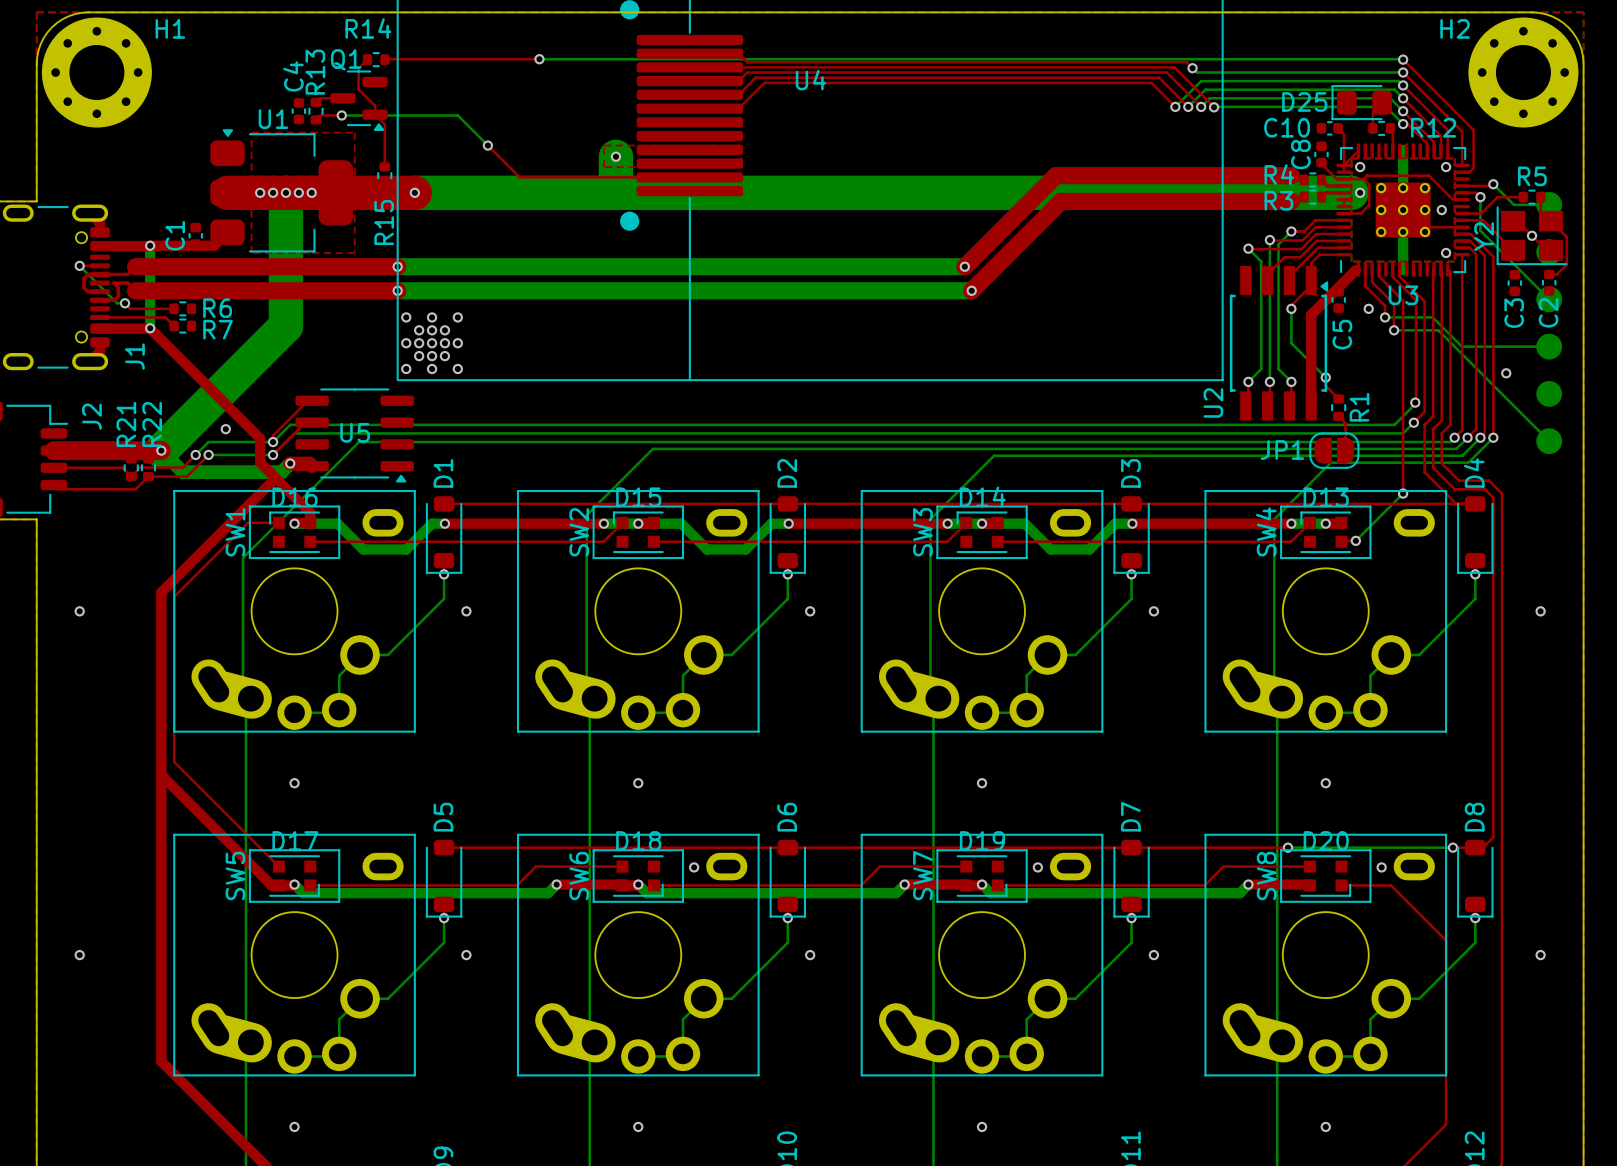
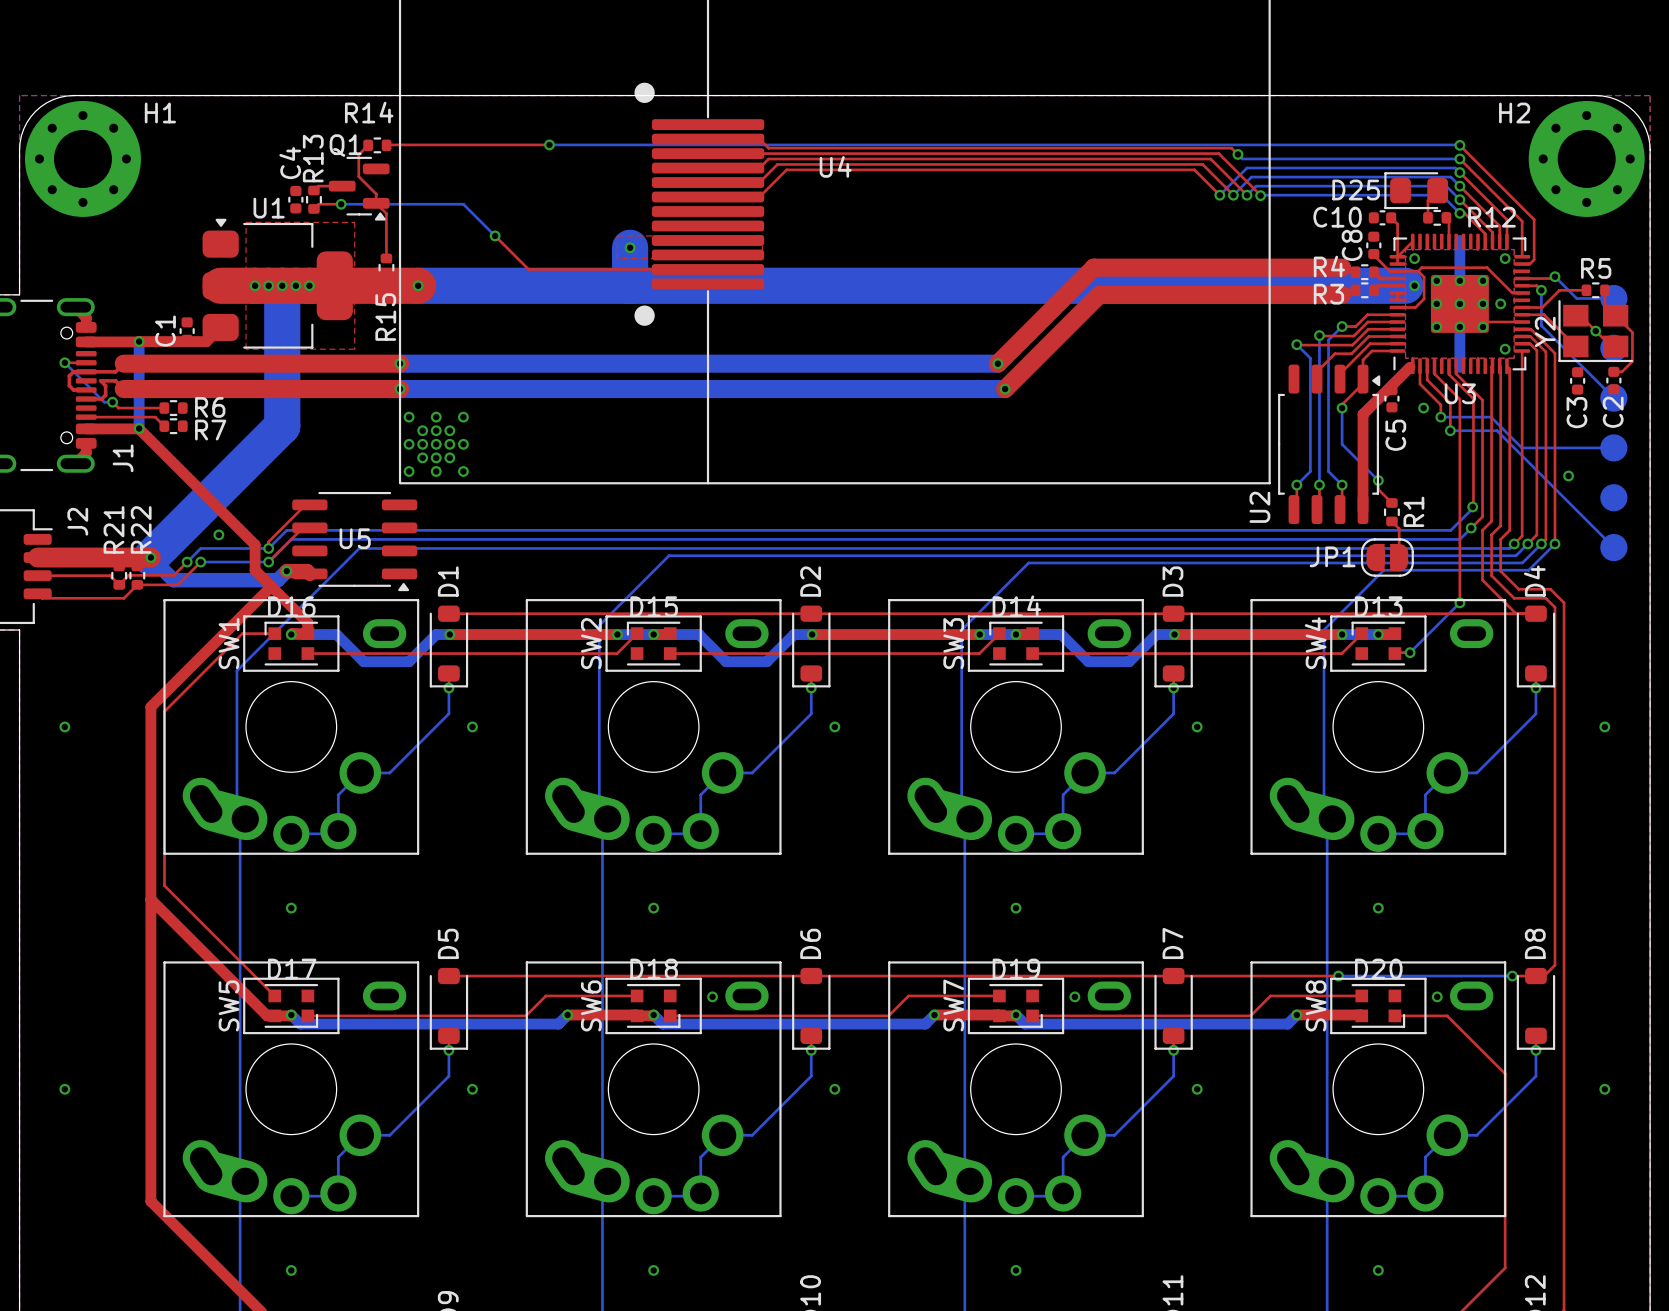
U2 footprint: [1229, 265, 1329, 421] -> [1278, 364, 1381, 525]

